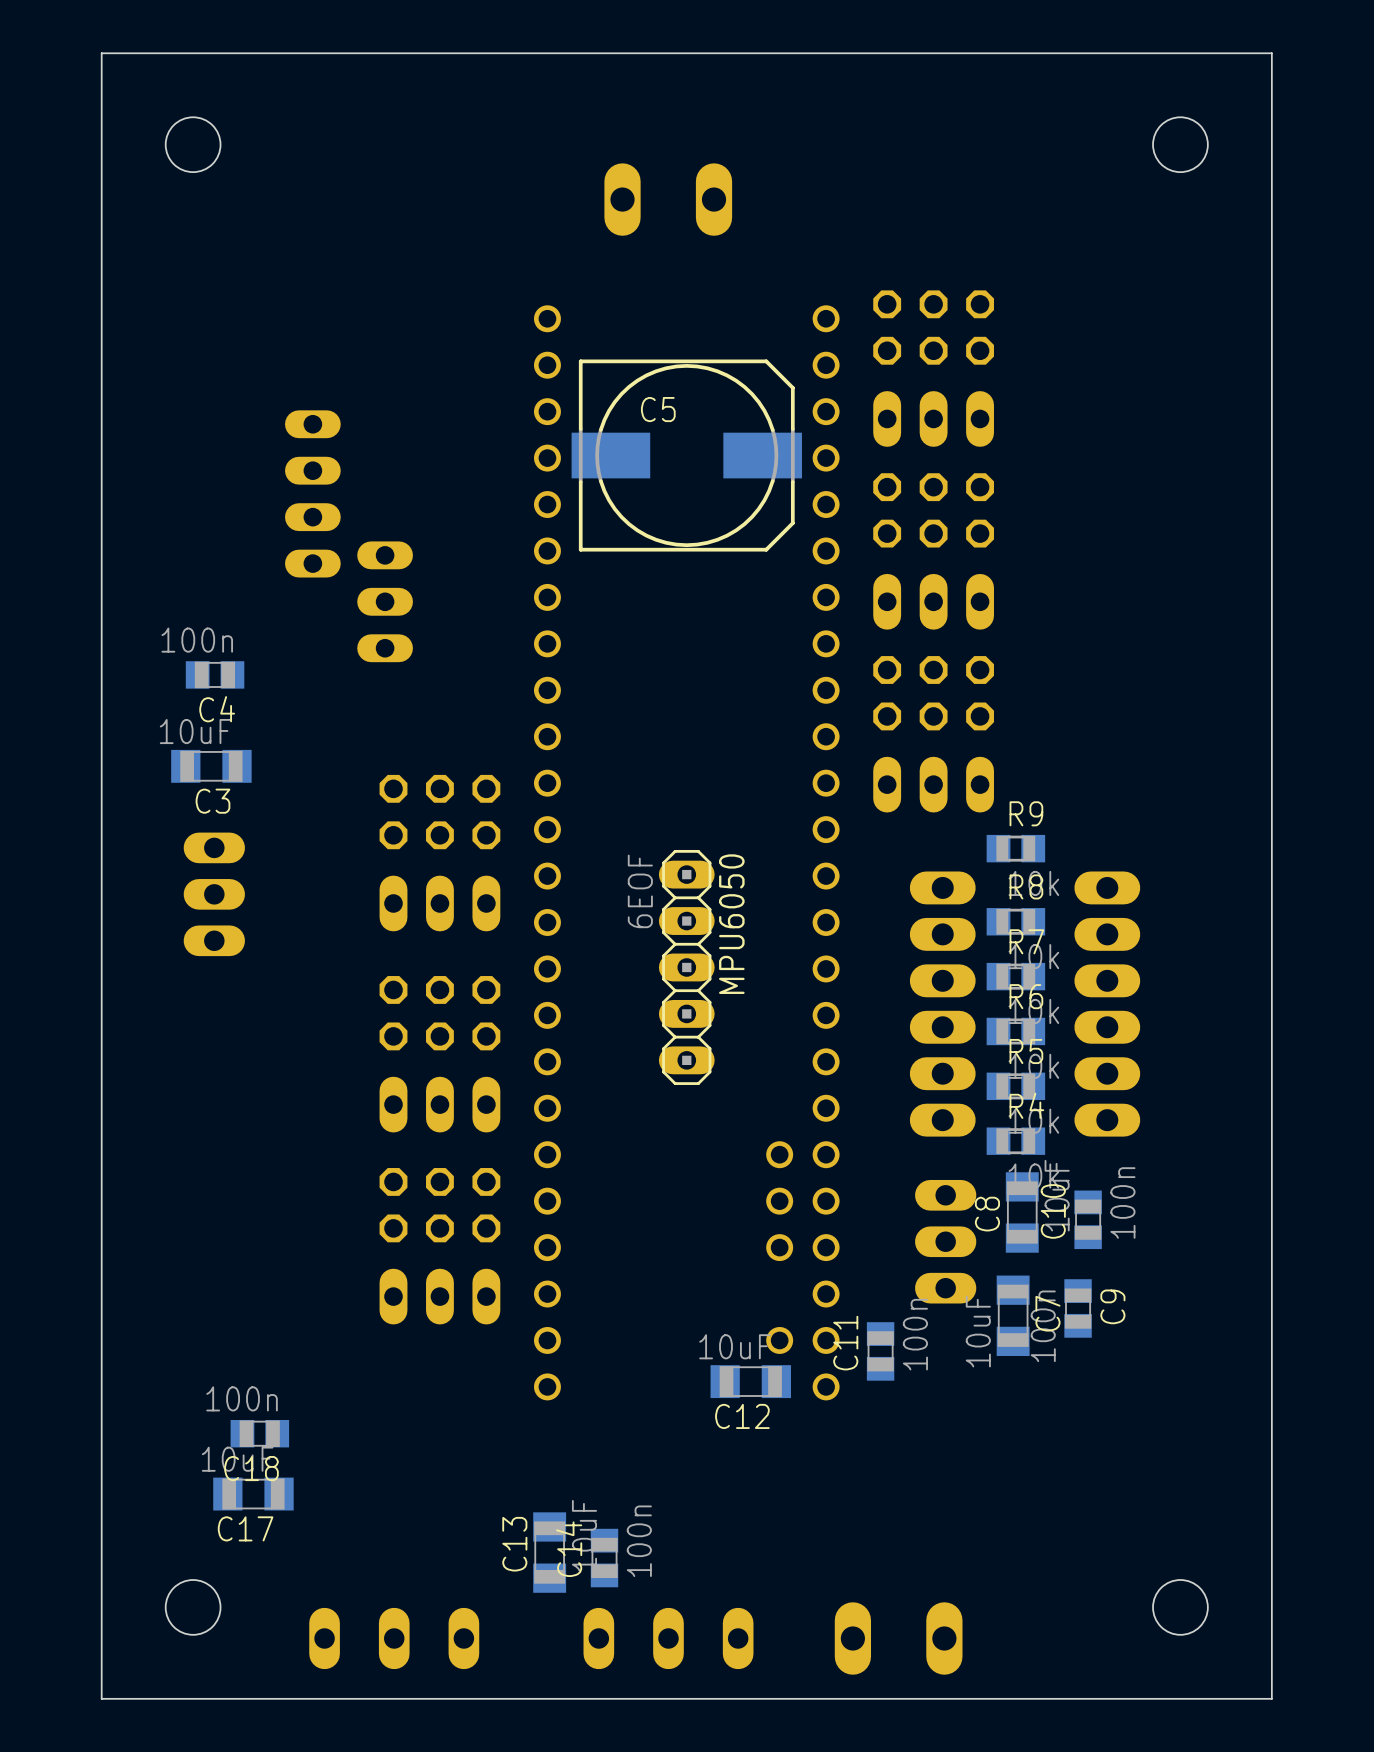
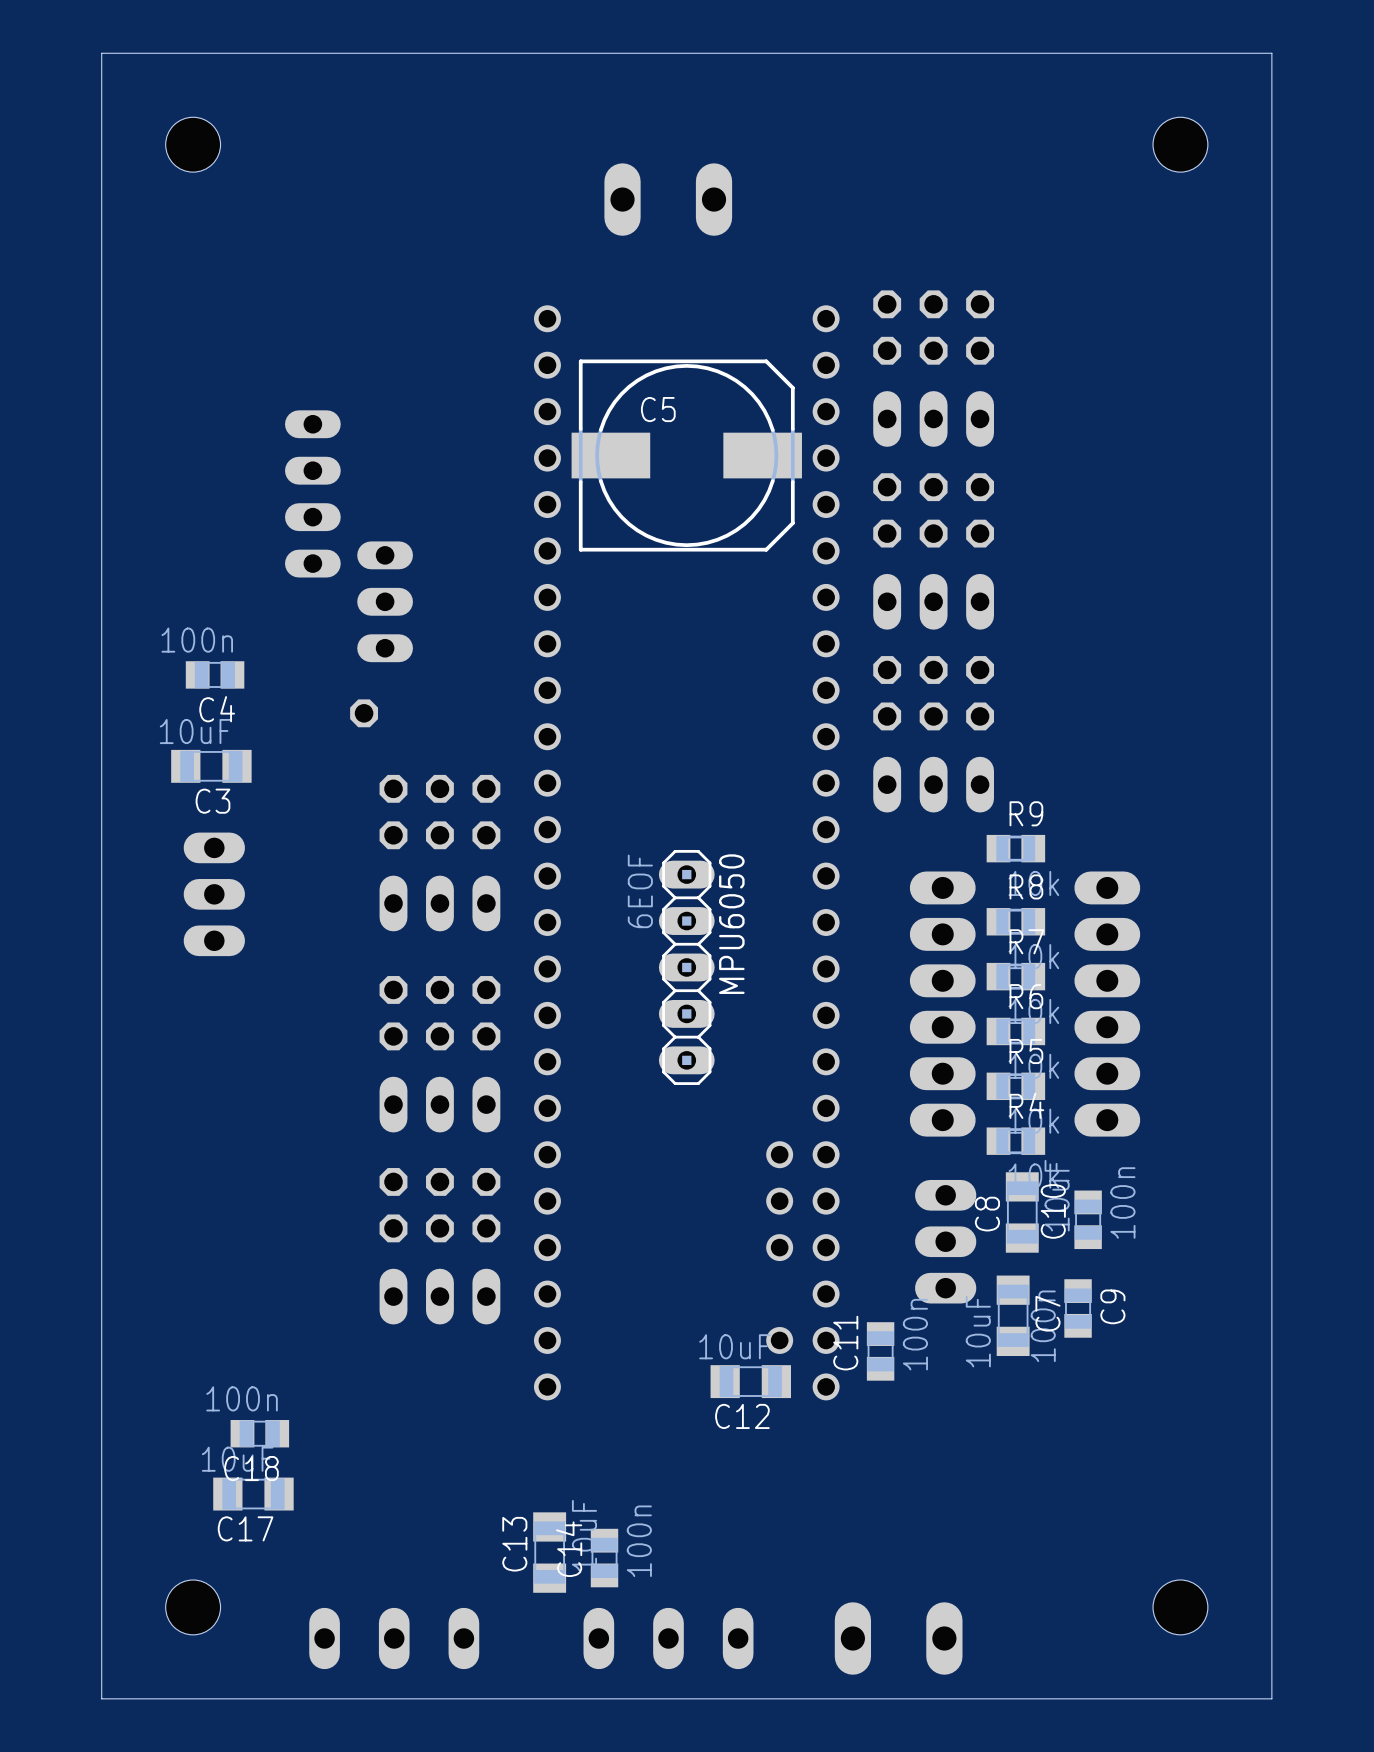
part: none -> (364, 713)

